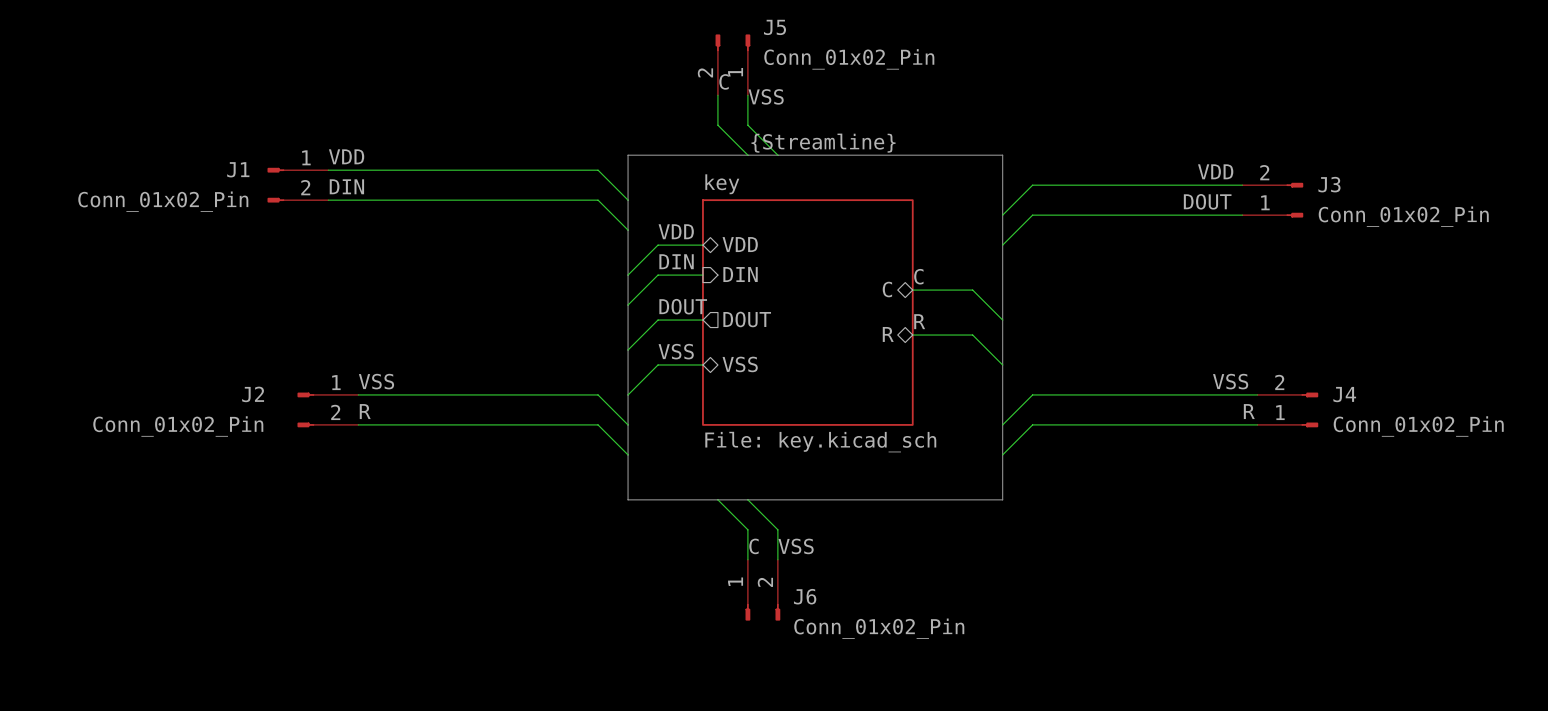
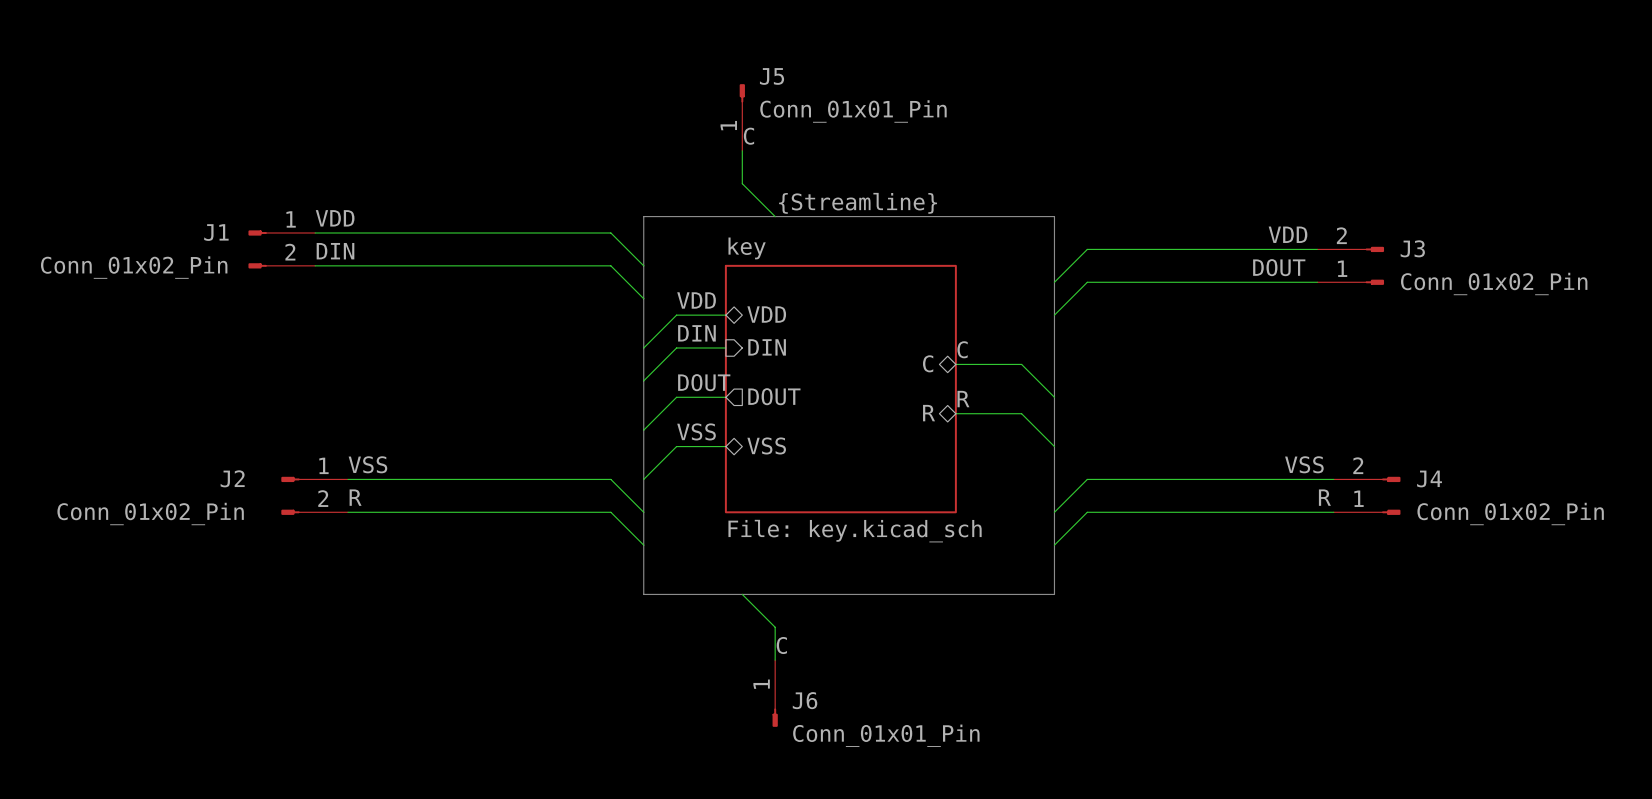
J5 symbol: [715, 34, 751, 96] -> [739, 84, 745, 151]
J5 value: Conn_01x02_Pin (849, 59) -> Conn_01x01_Pin (853, 111)
wire: (747, 95) (747, 125) (777, 155) -> none
label: VSS (766, 96) -> none
wire: (747, 499) (777, 529) (777, 559) -> none
label: VSS (796, 546) -> none
J6 symbol: [745, 559, 781, 621] -> [772, 660, 778, 727]
J6 value: Conn_01x02_Pin (879, 628) -> Conn_01x01_Pin (886, 735)

